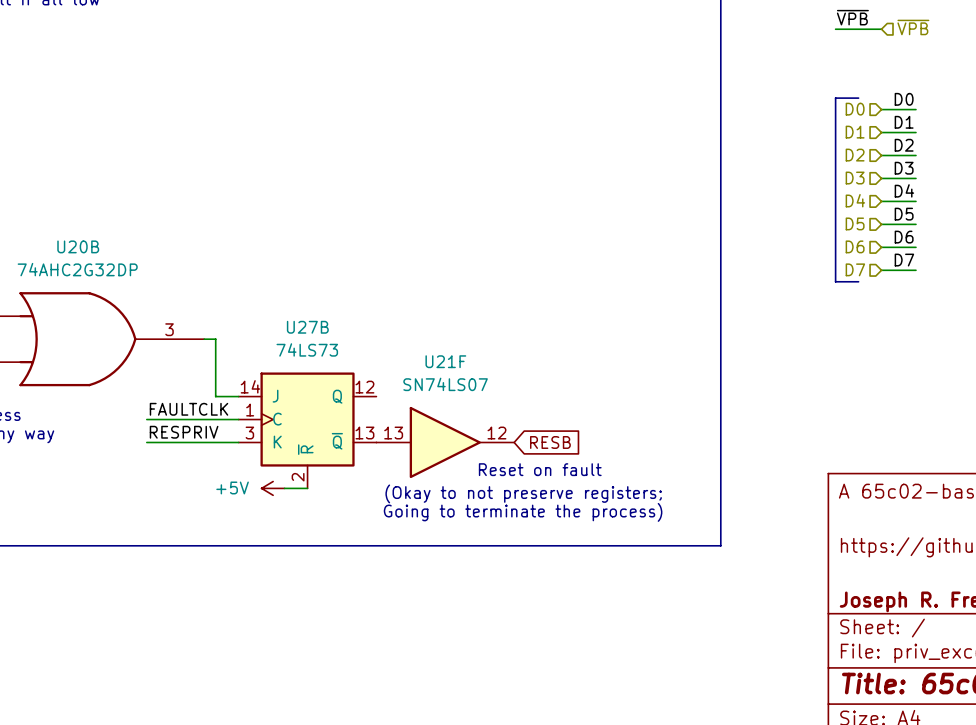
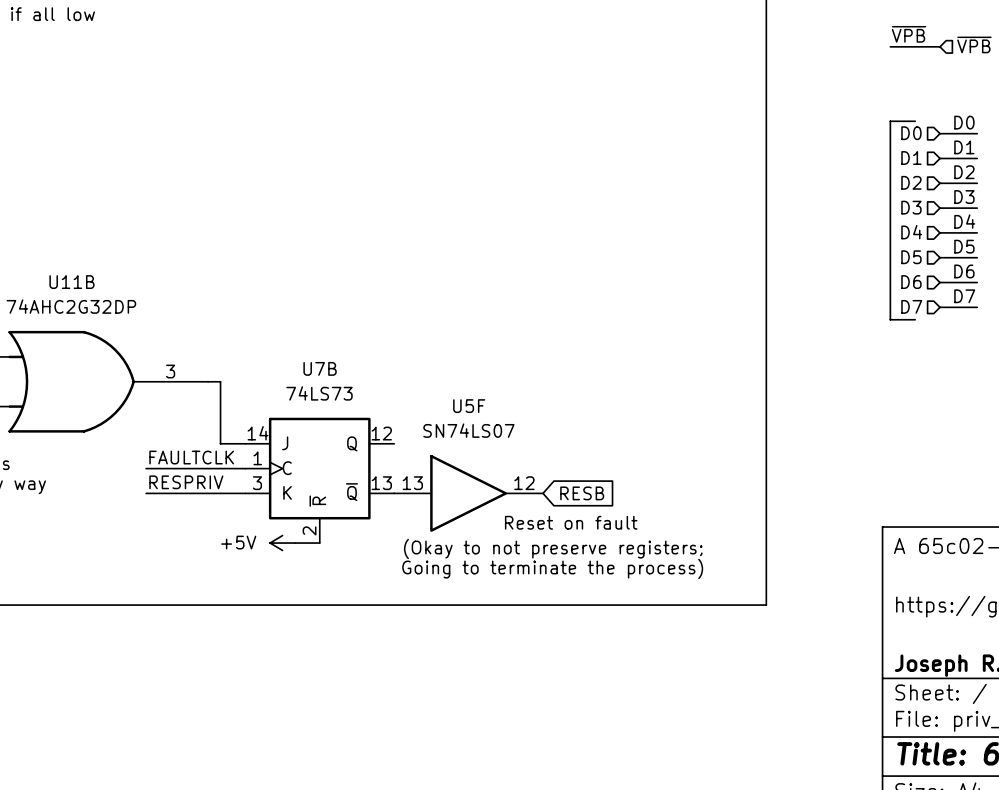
U20B name: U20B (78, 246) -> U11B (71, 282)
U27B name: U27B (307, 327) -> U7B (320, 368)
U21F name: U21F (445, 361) -> U5F (469, 406)

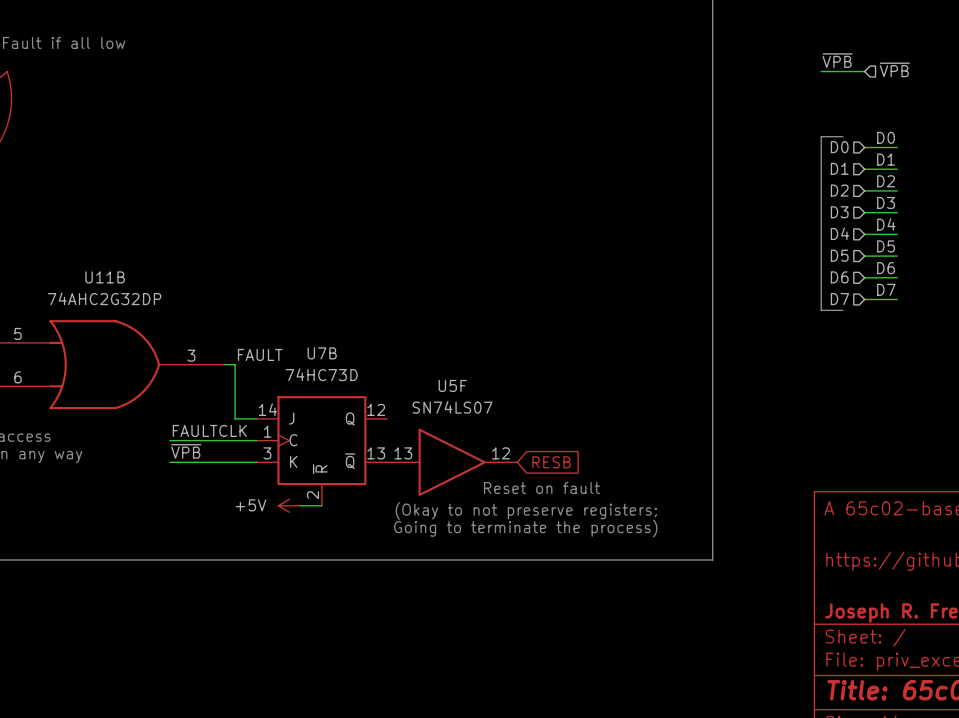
label: none -> FAULT (260, 354)
U7B value: 74LS73 (319, 393) -> 74HC73D (321, 374)
label: RESPRIV (186, 482) -> ~{VPB} (186, 451)

